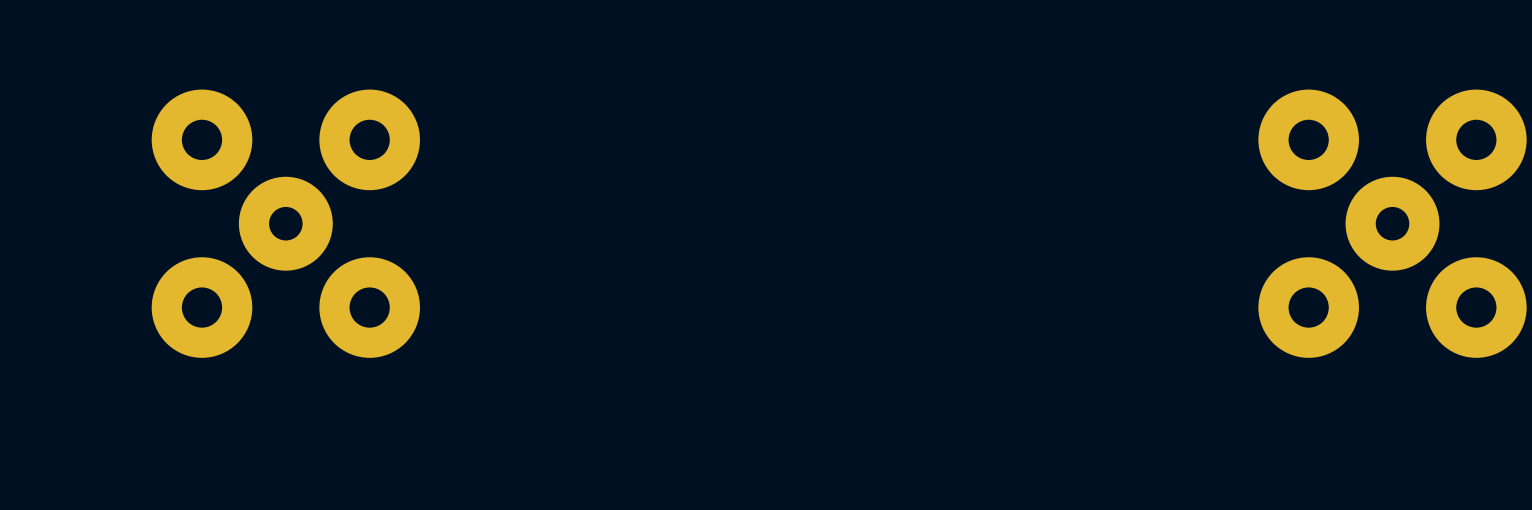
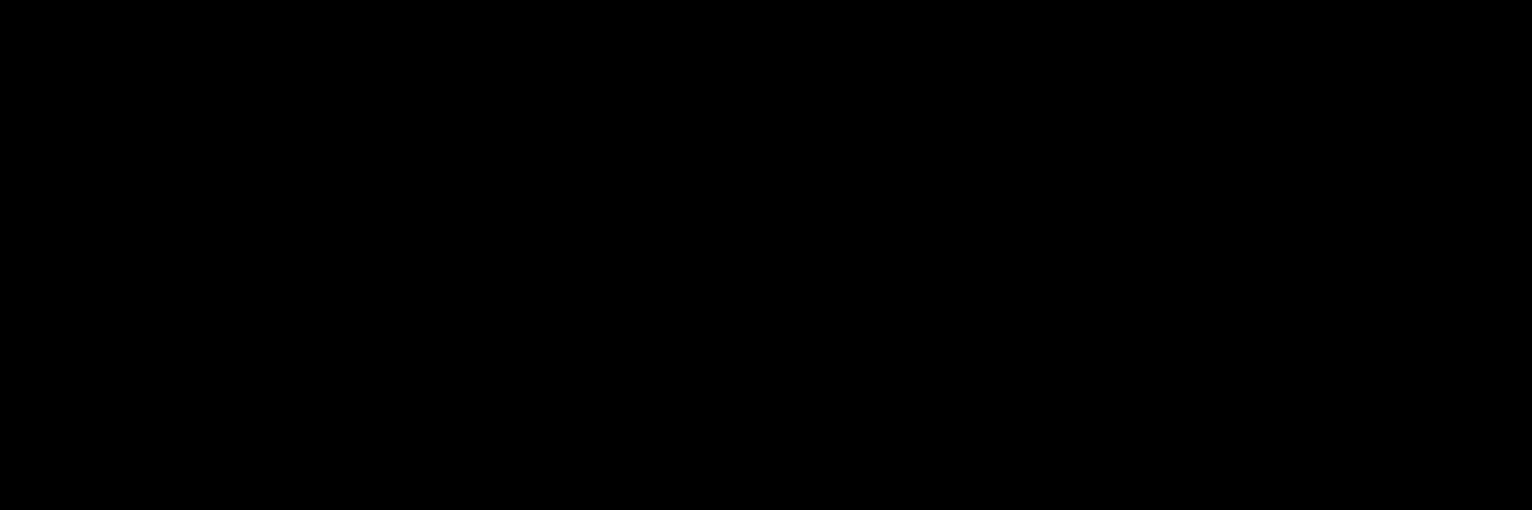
part: (285, 223) -> none
part: (1392, 223) -> none

